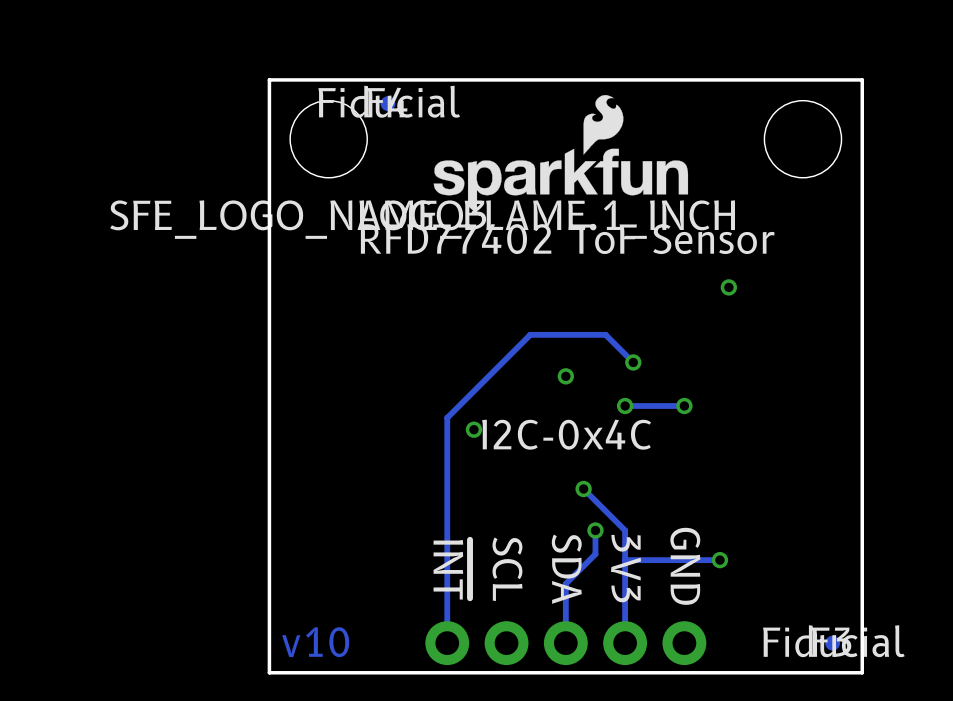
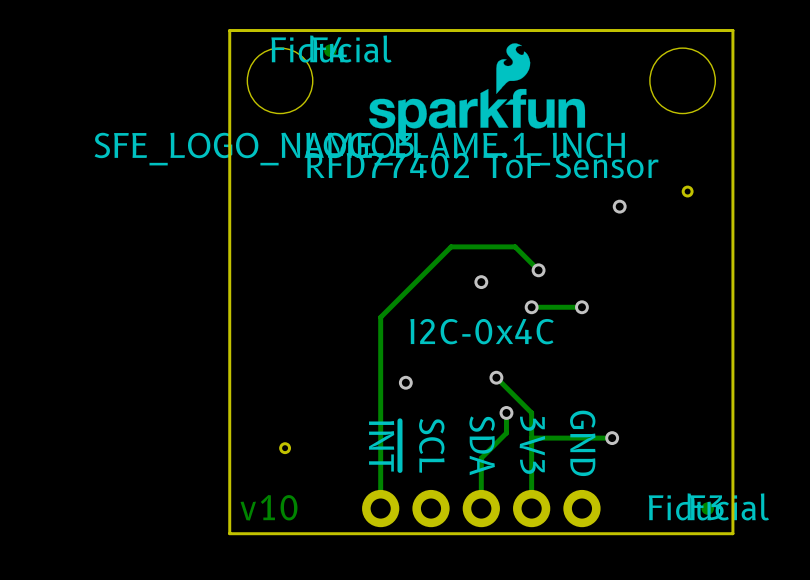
part: none -> (687, 191)
via position: (473, 429) -> (405, 382)
part: none -> (285, 448)

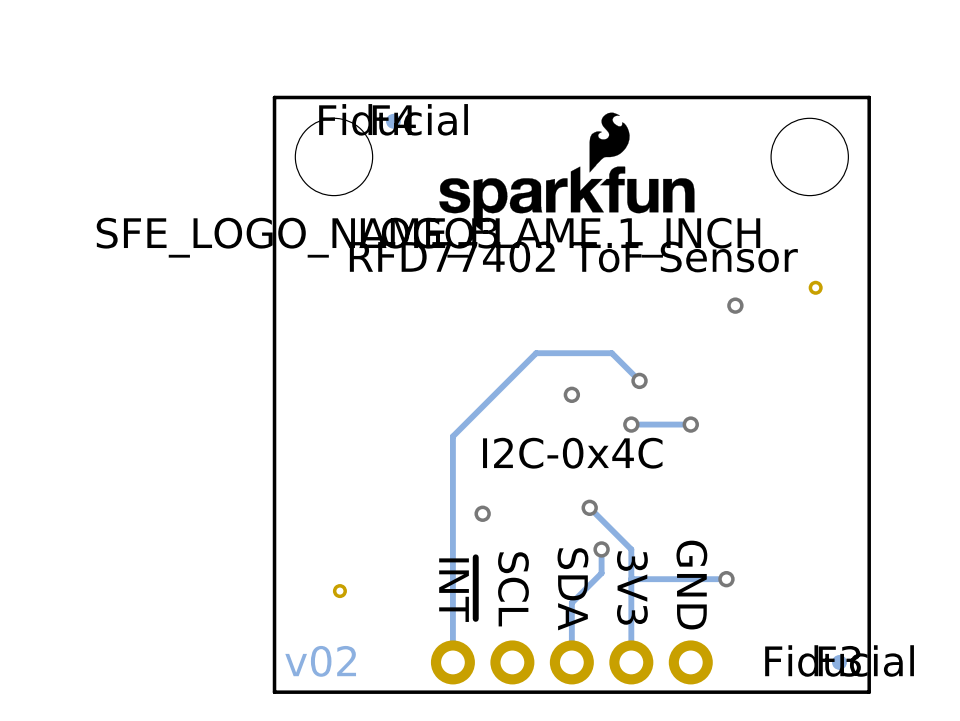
text: v10 (268, 507) -> v02 (320, 661)

